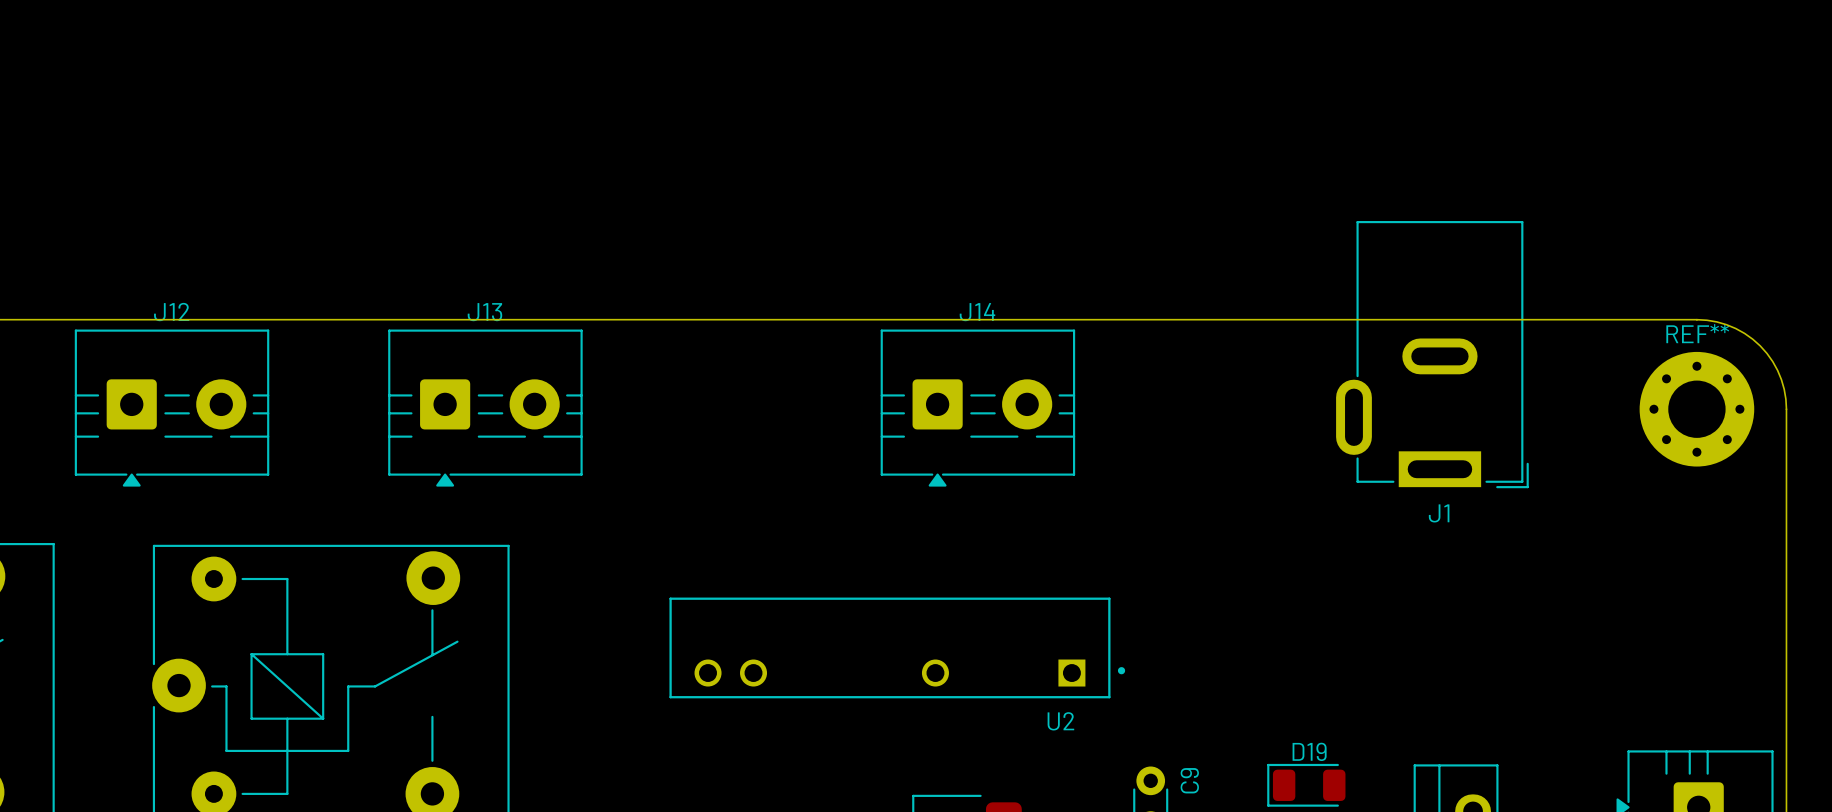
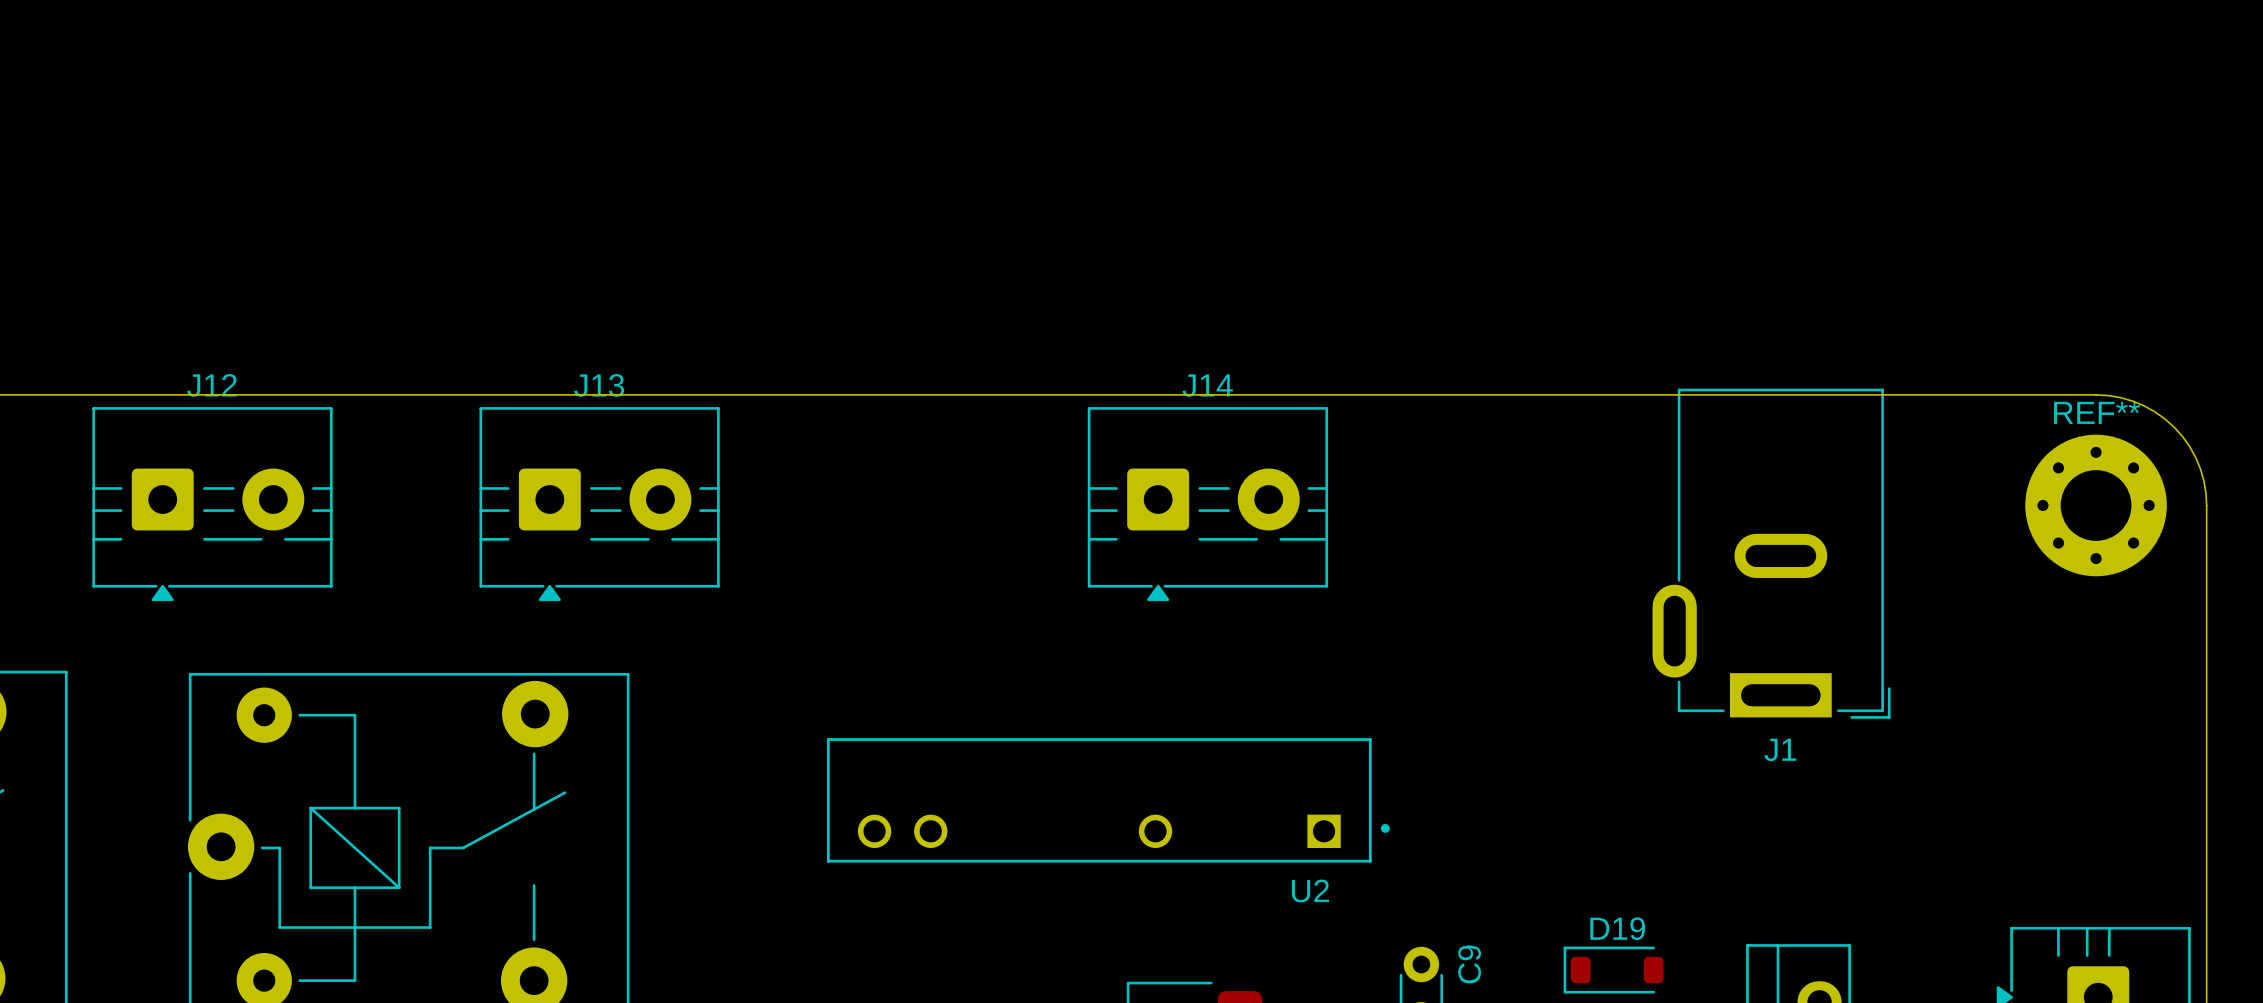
J1 position: (1432, 354) -> (1771, 553)
D19 footprint: [1267, 763, 1346, 807] -> [1563, 946, 1664, 994]

